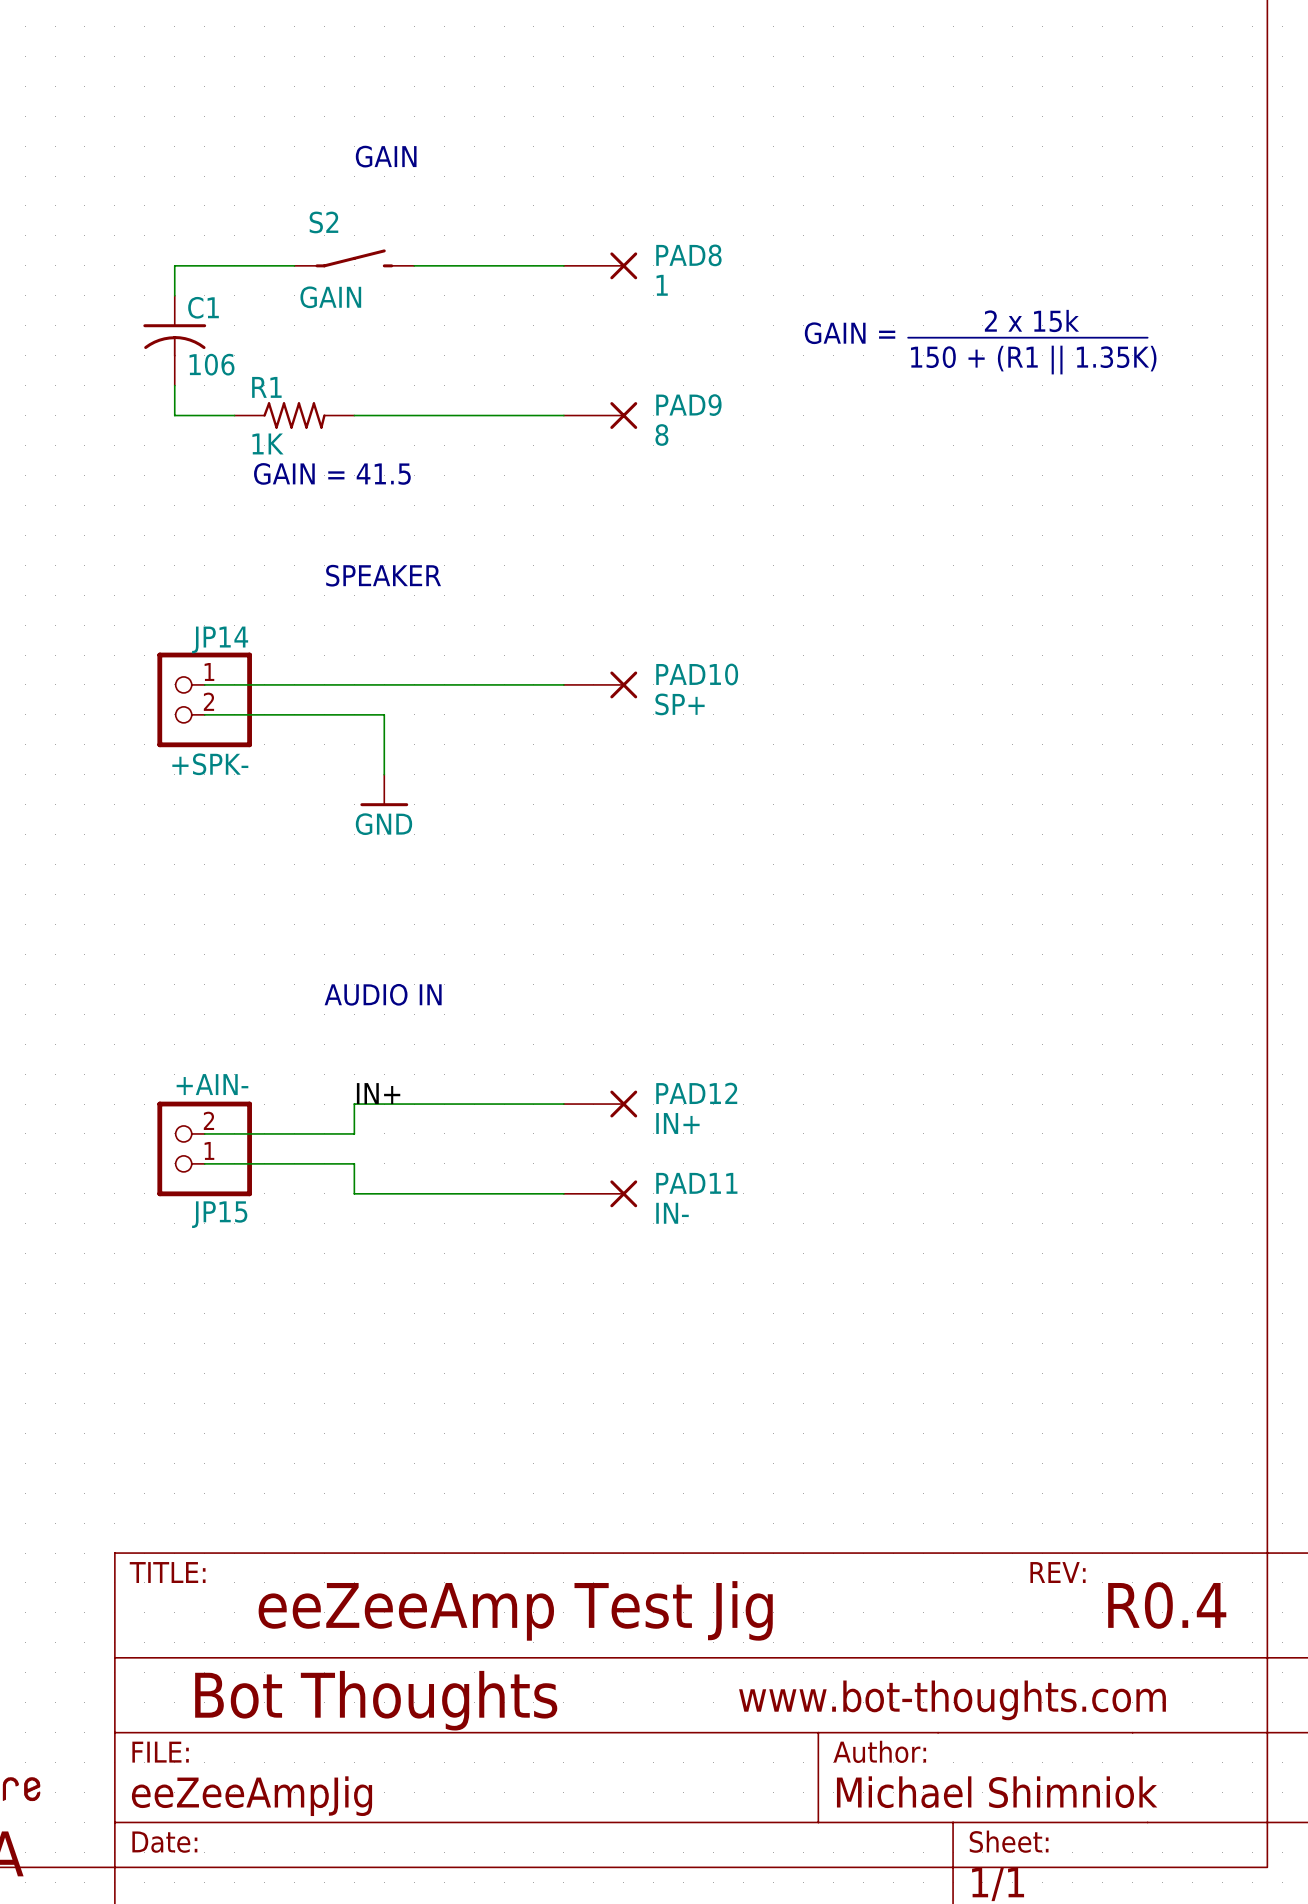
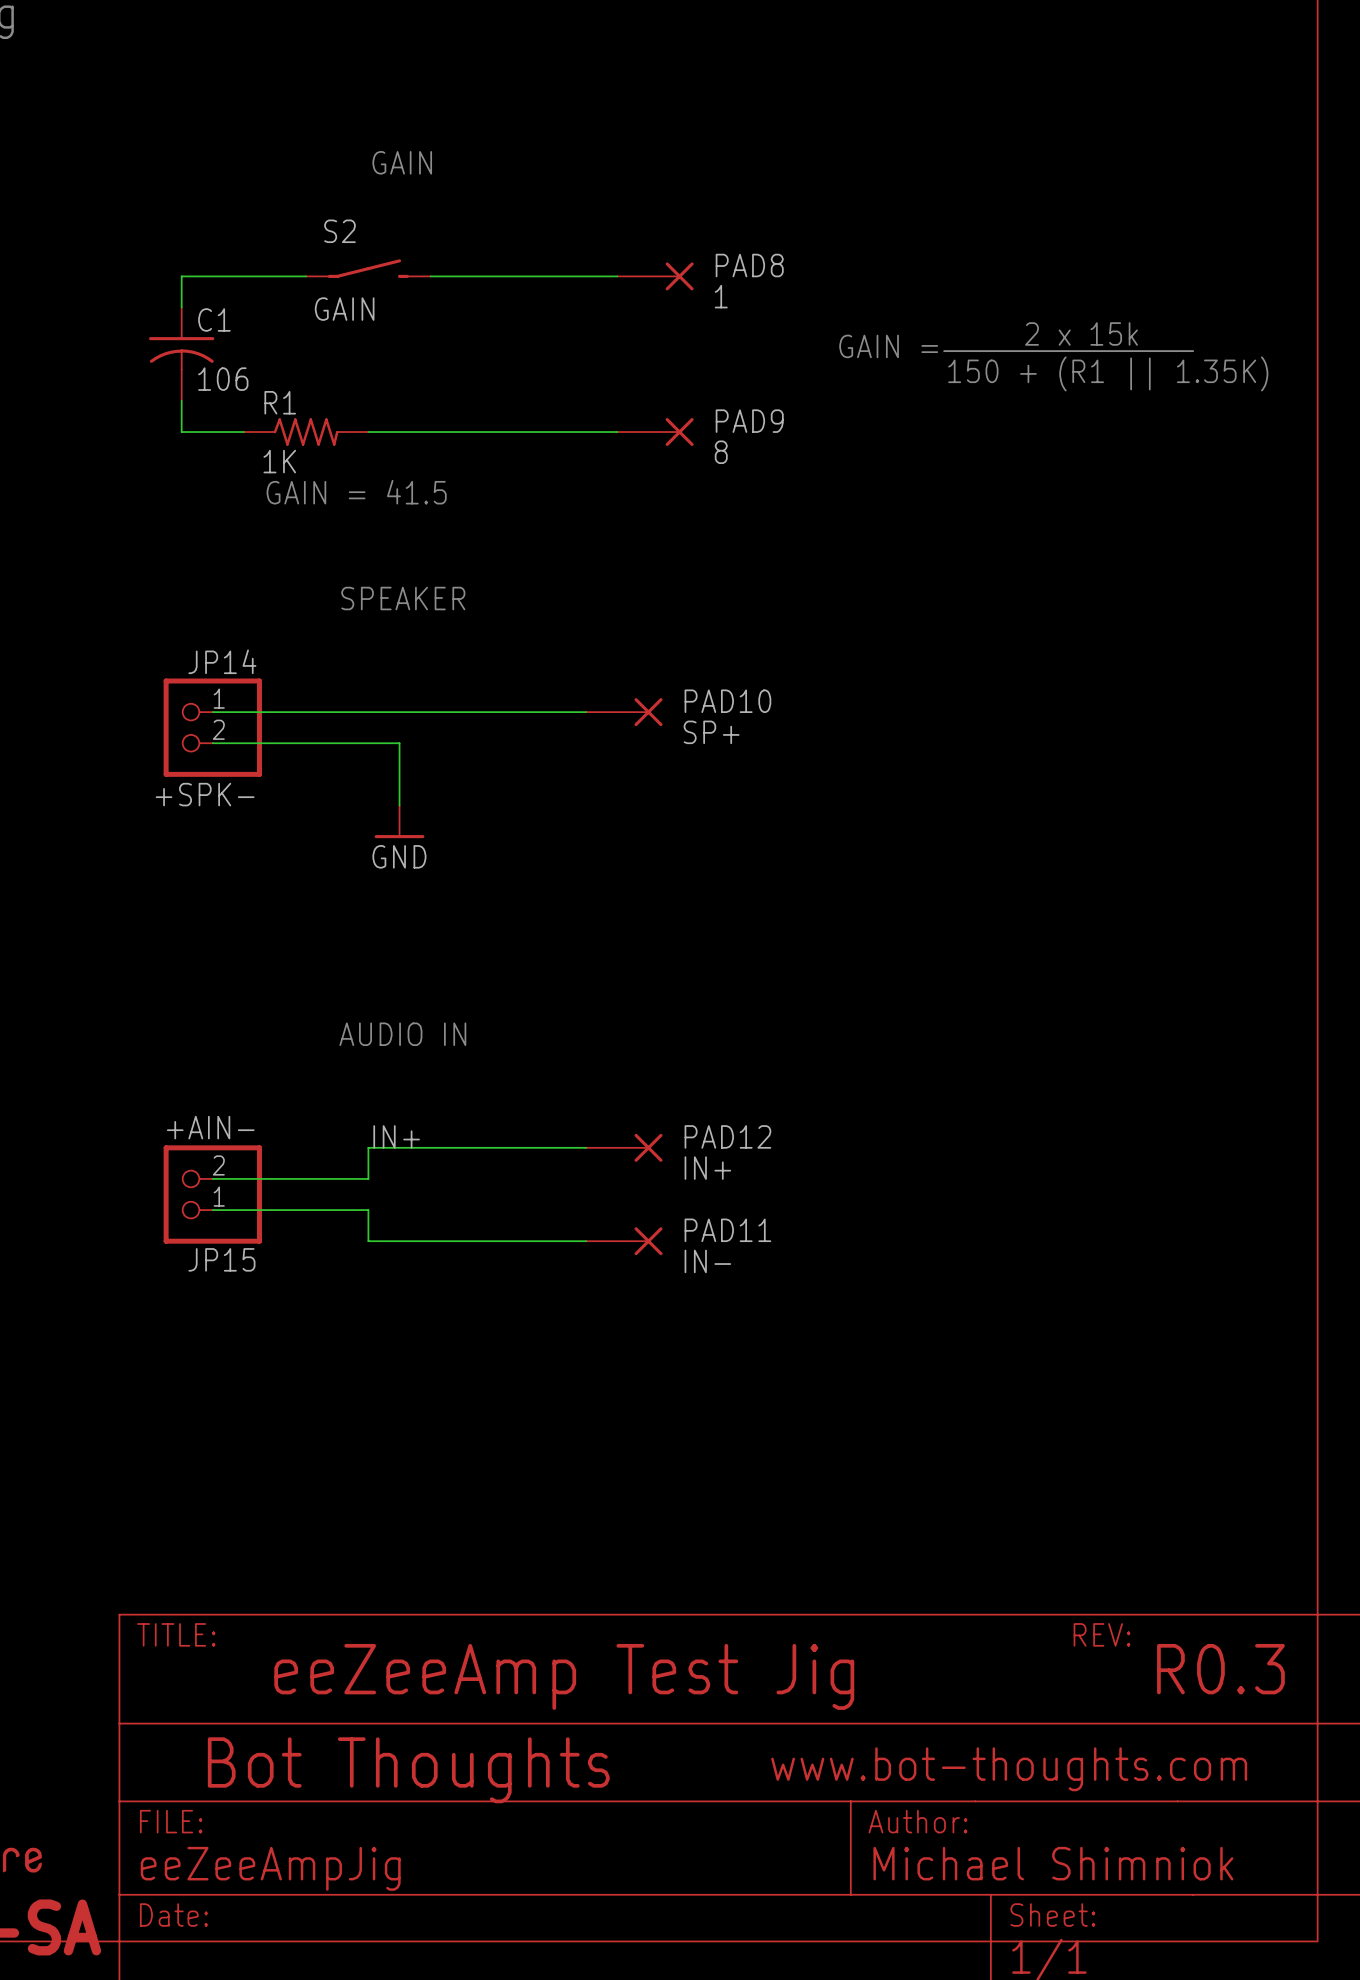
PAD8 position: (600, 265) -> (655, 276)
PAD9 position: (600, 415) -> (655, 432)
text: R0.4 (1167, 1605) -> R0.3 (1220, 1669)

